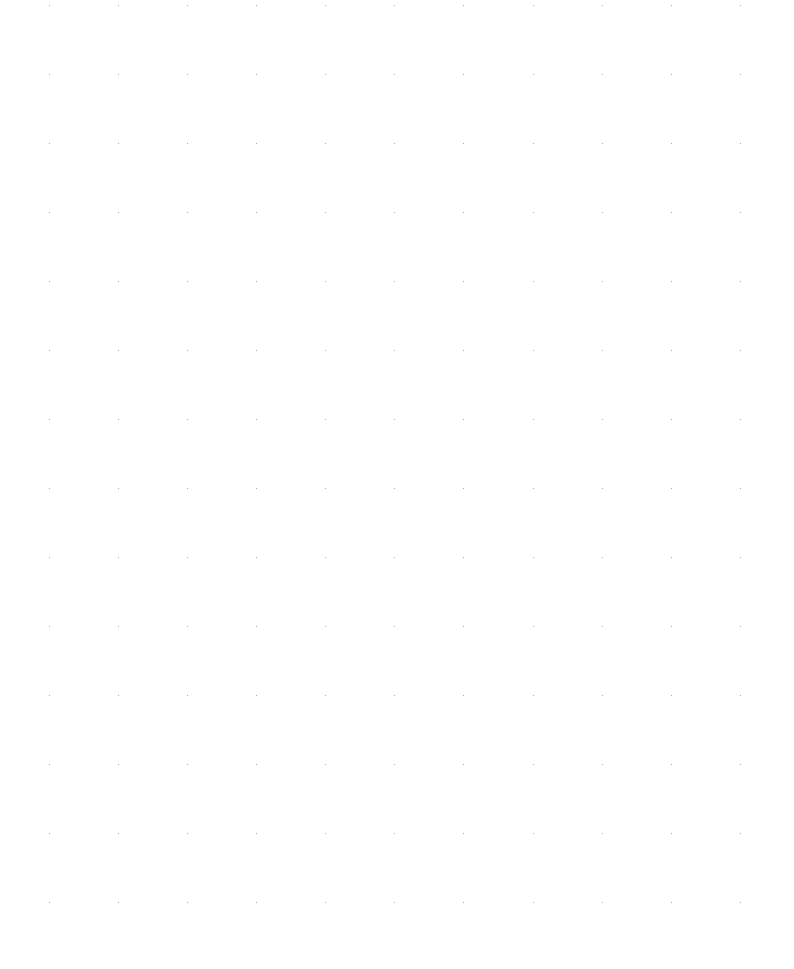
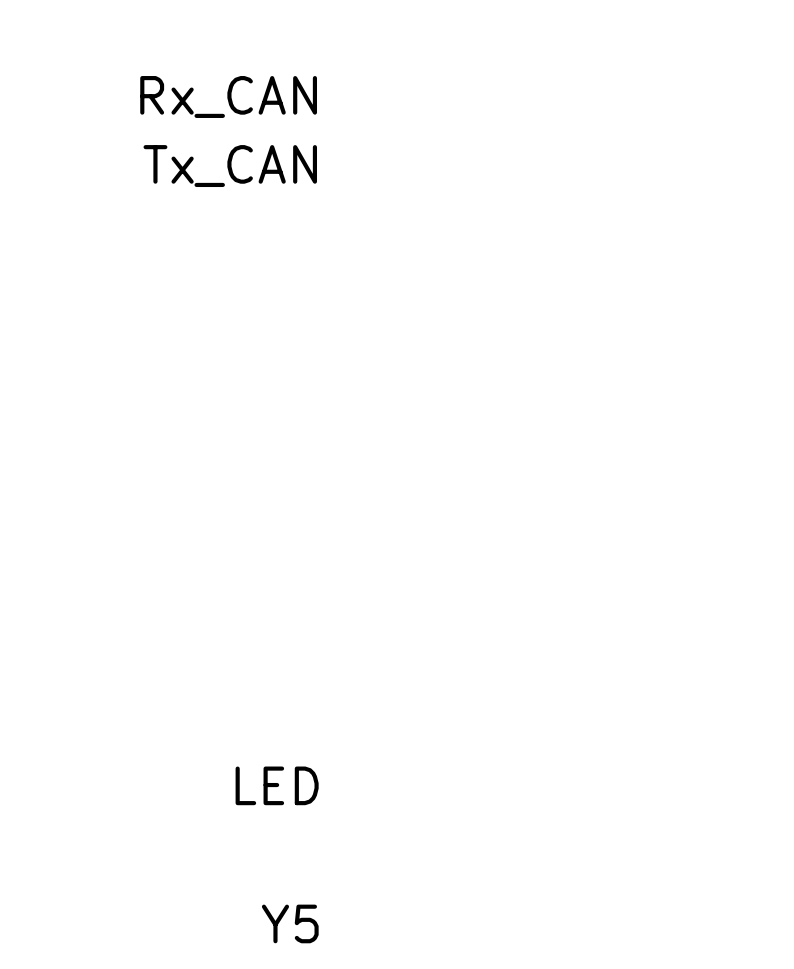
label: none -> Rx_CAN (228, 96)
label: none -> Tx_CAN (230, 166)
label: none -> LED (277, 785)
label: none -> Y5 (290, 923)

